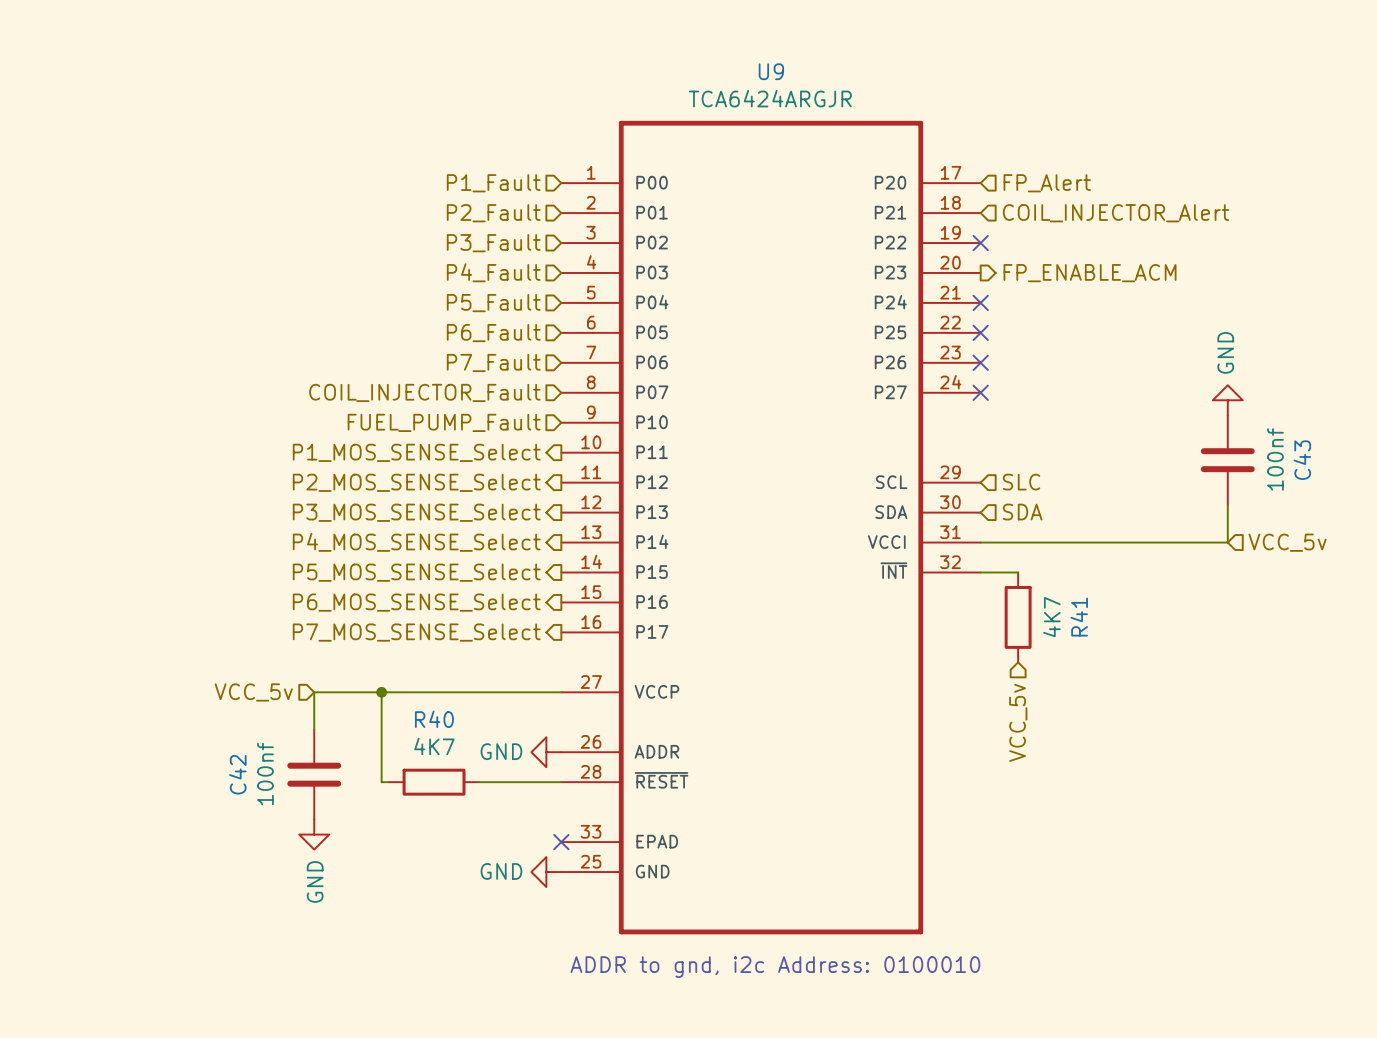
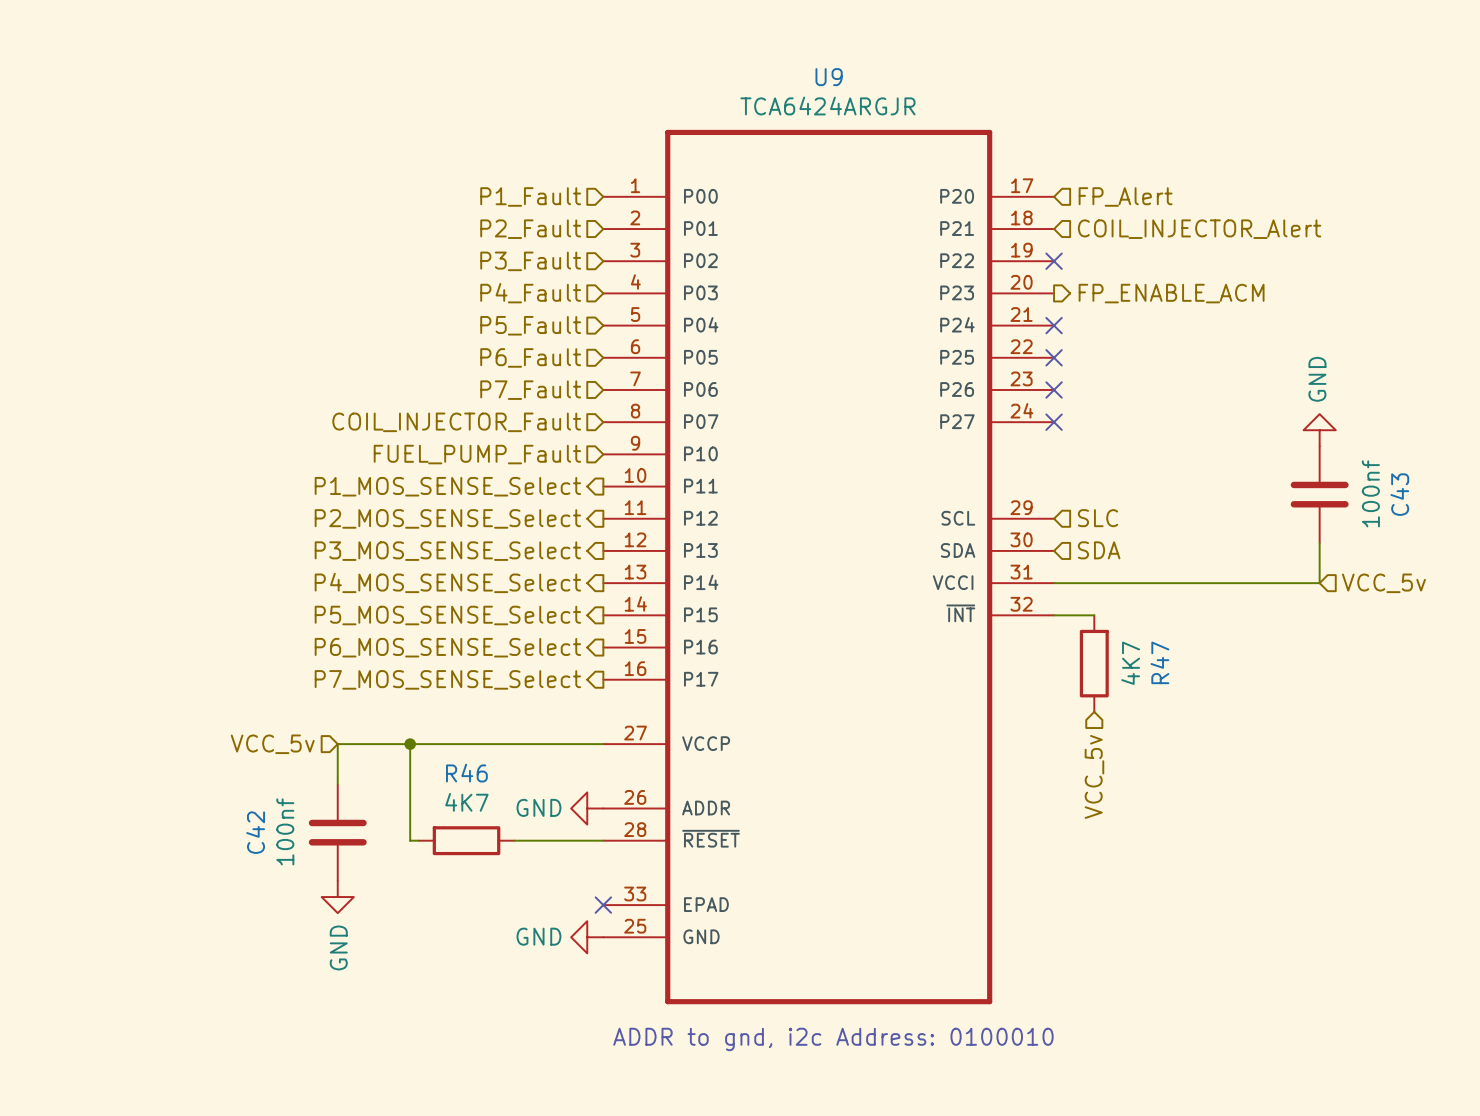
R41 name: R41 (1079, 617) -> R47 (1159, 662)
R40 name: R40 (434, 719) -> R46 (466, 773)

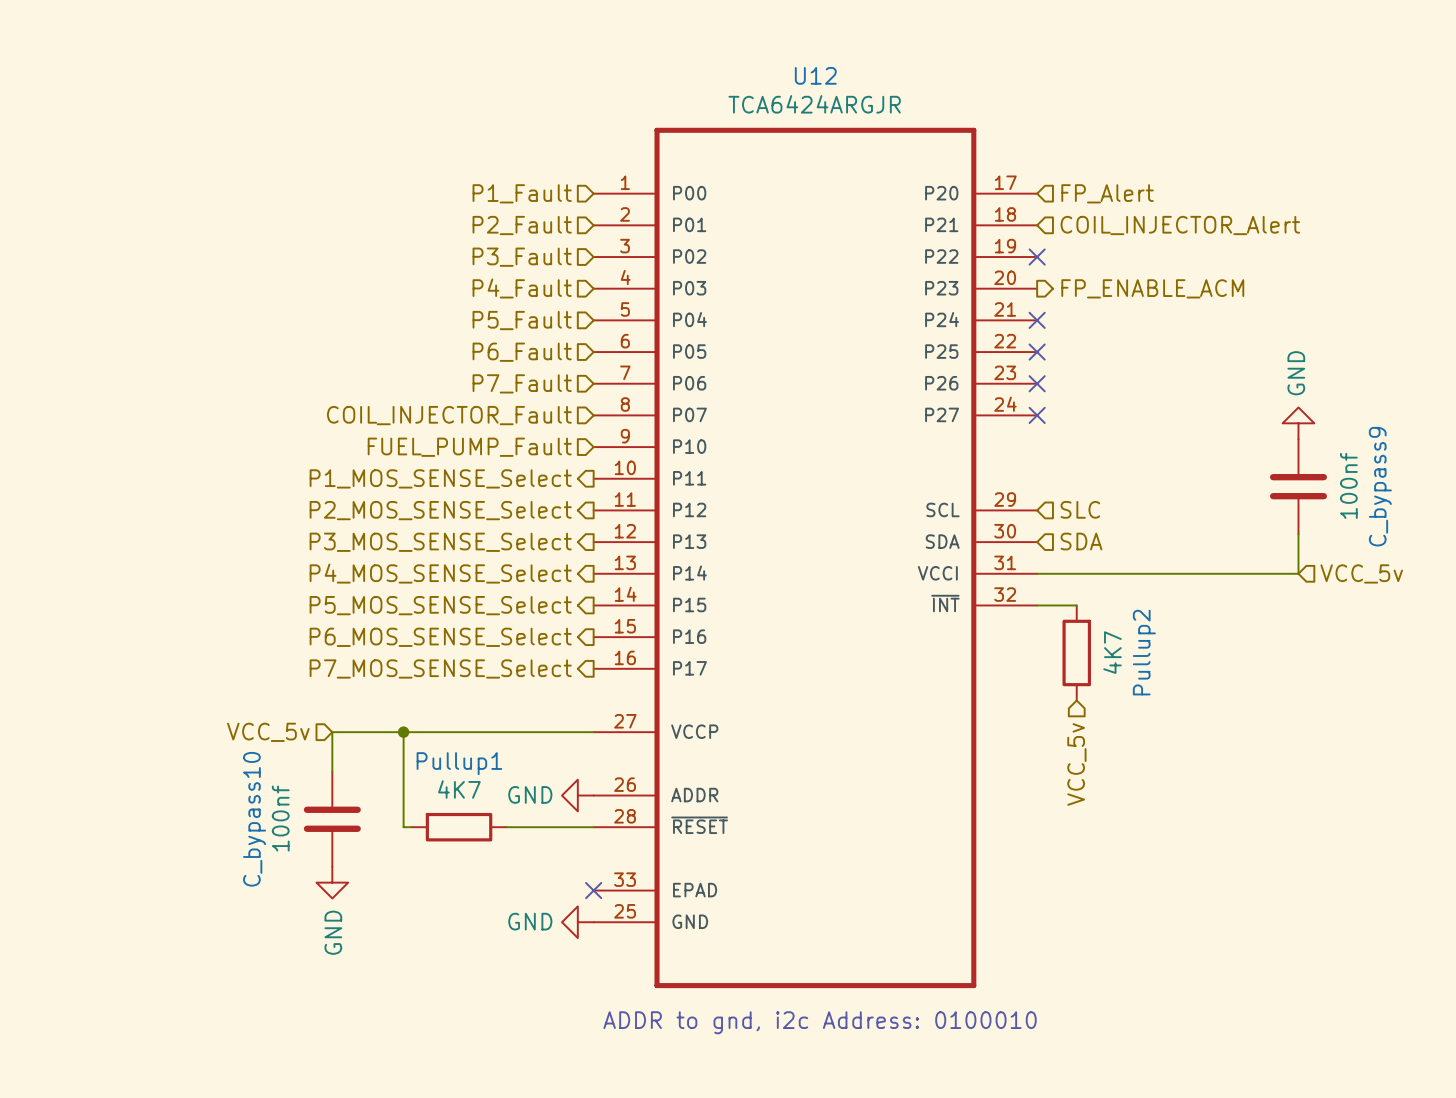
U9 name: U9 (829, 77) -> U12 (815, 75)
C43 name: C43 (1399, 494) -> C_bypass9 (1380, 486)
R47 name: R47 (1159, 662) -> Pullup2 (1144, 652)
R46 name: R46 (466, 773) -> Pullup1 (459, 763)
C42 name: C42 (255, 832) -> C_bypass10 (254, 819)

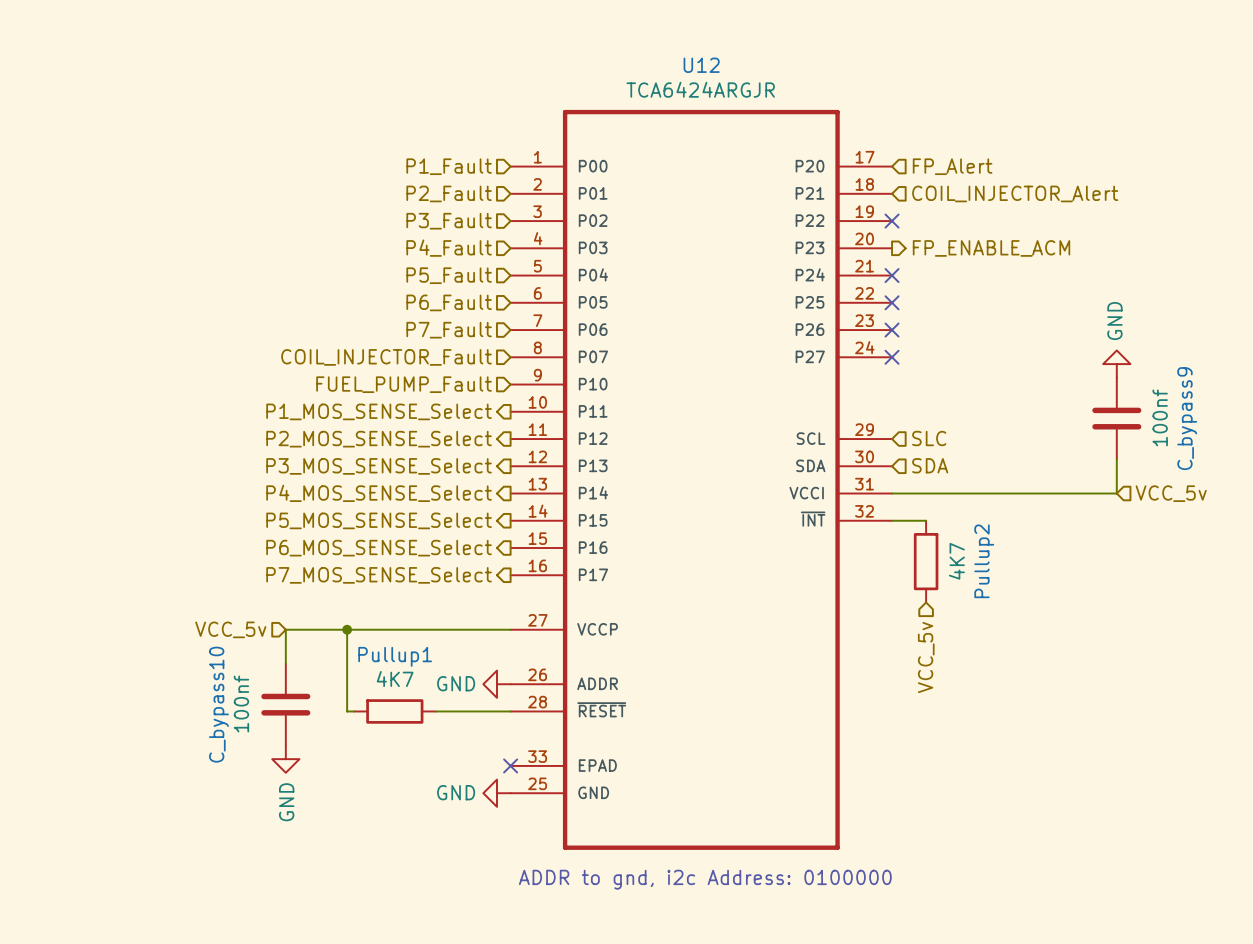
text: ADDR to gnd, i2c Address: 0100010 (820, 1022) -> ADDR to gnd, i2c Address: 0100000 (705, 879)

